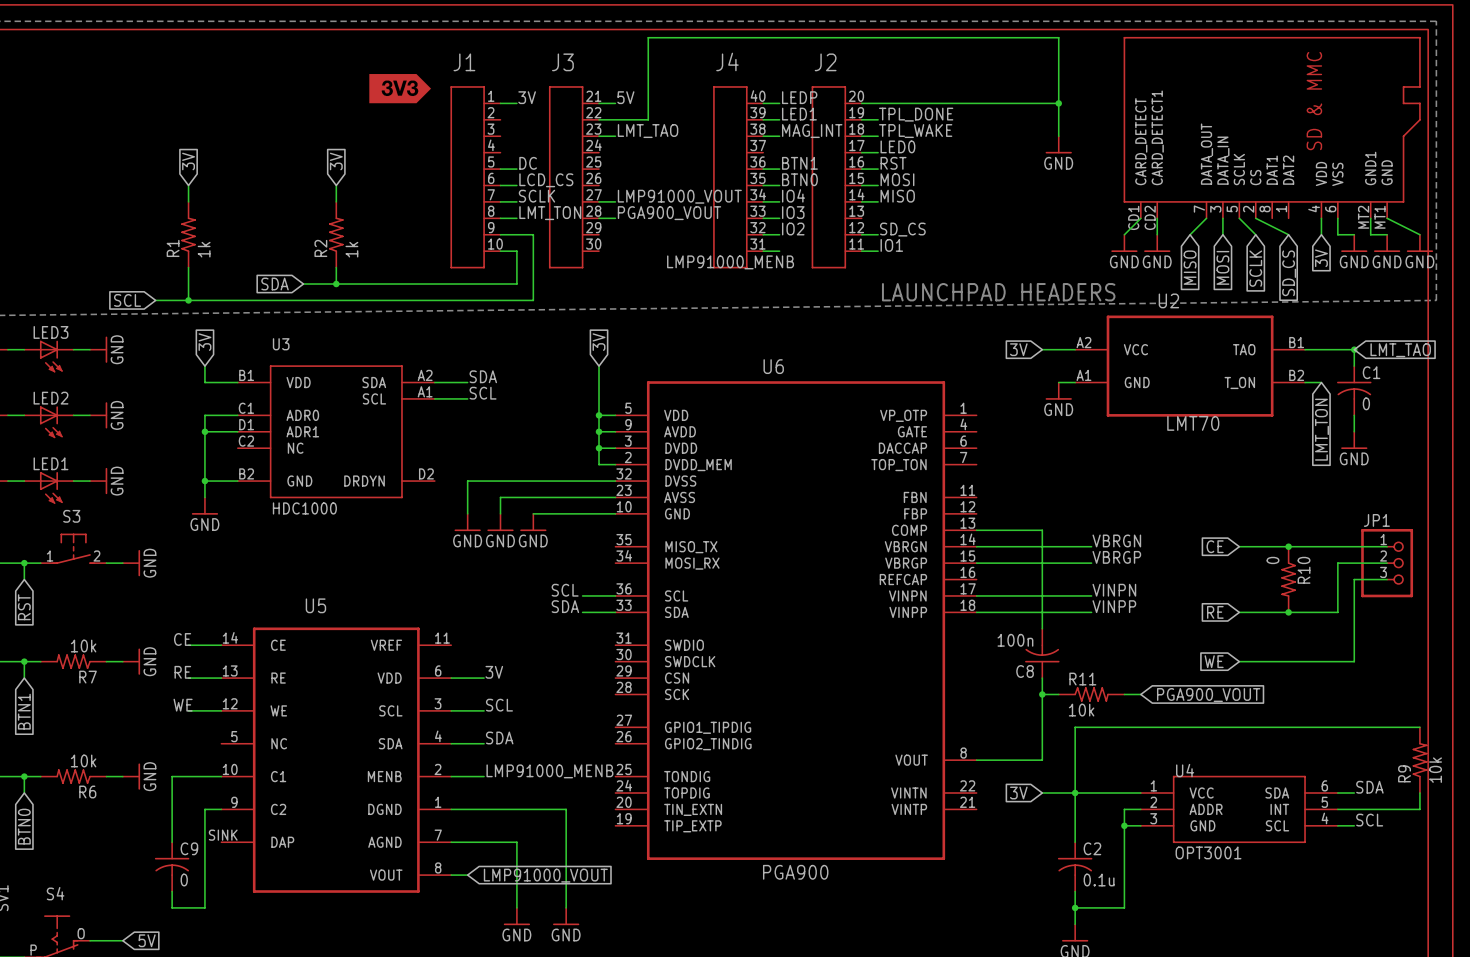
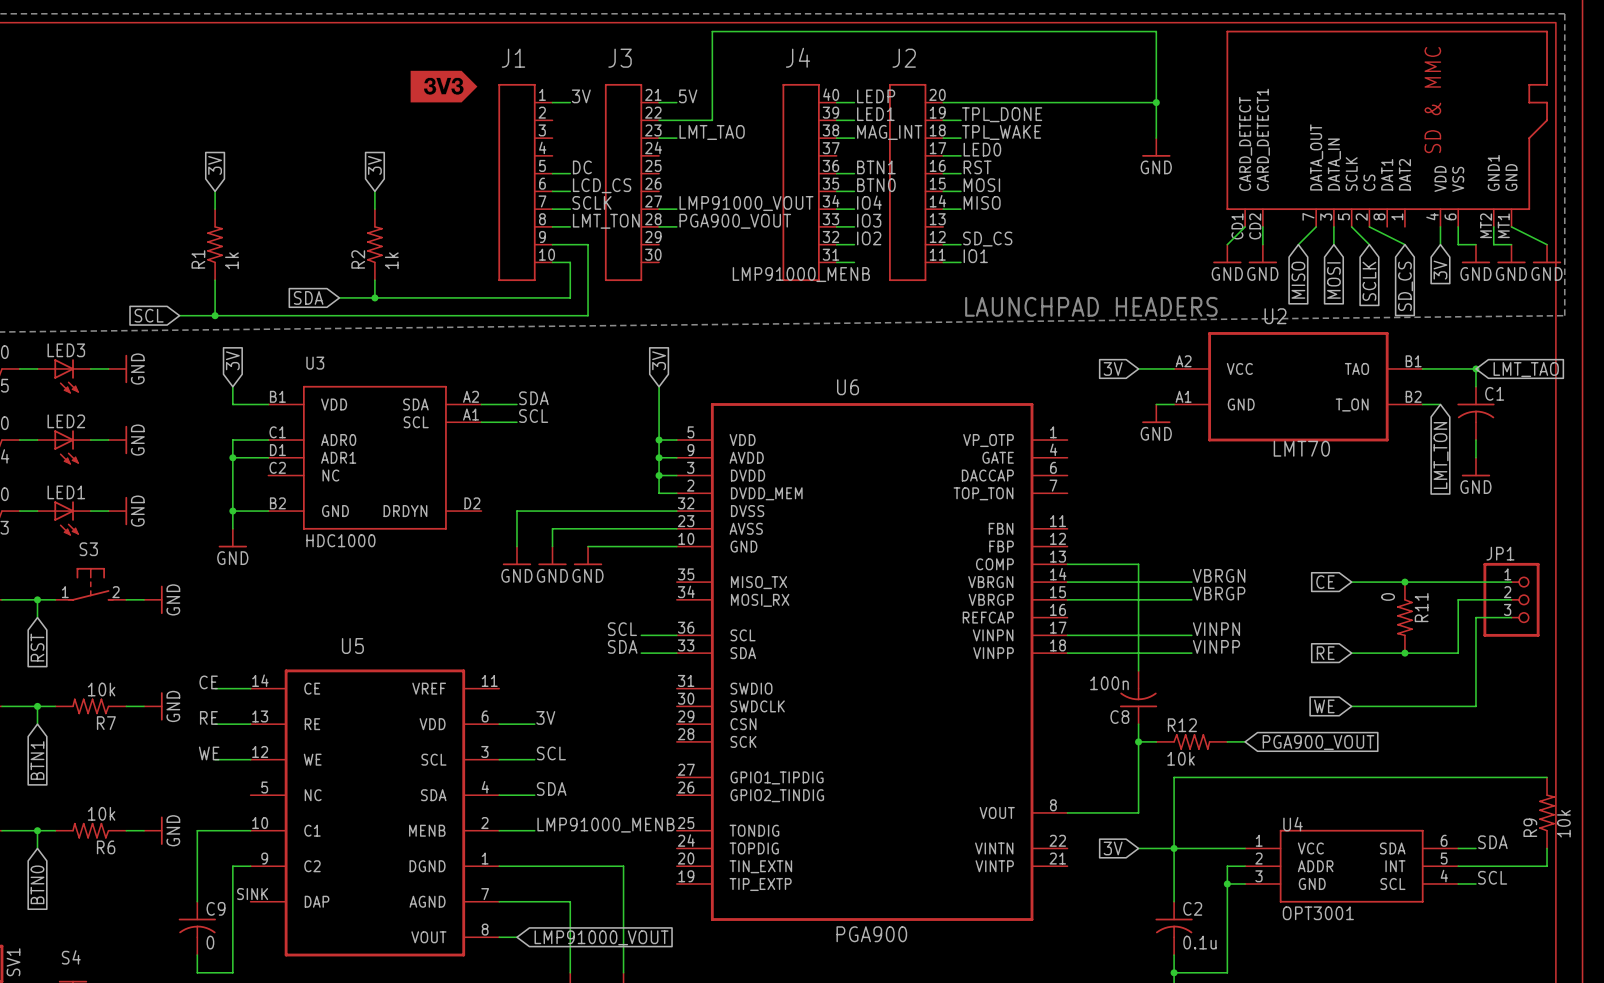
C1 value: 0 (1366, 403) -> none
R10 name: R10 (1304, 570) -> R11 (1421, 607)
R11 name: R11 (1082, 679) -> R12 (1182, 725)

